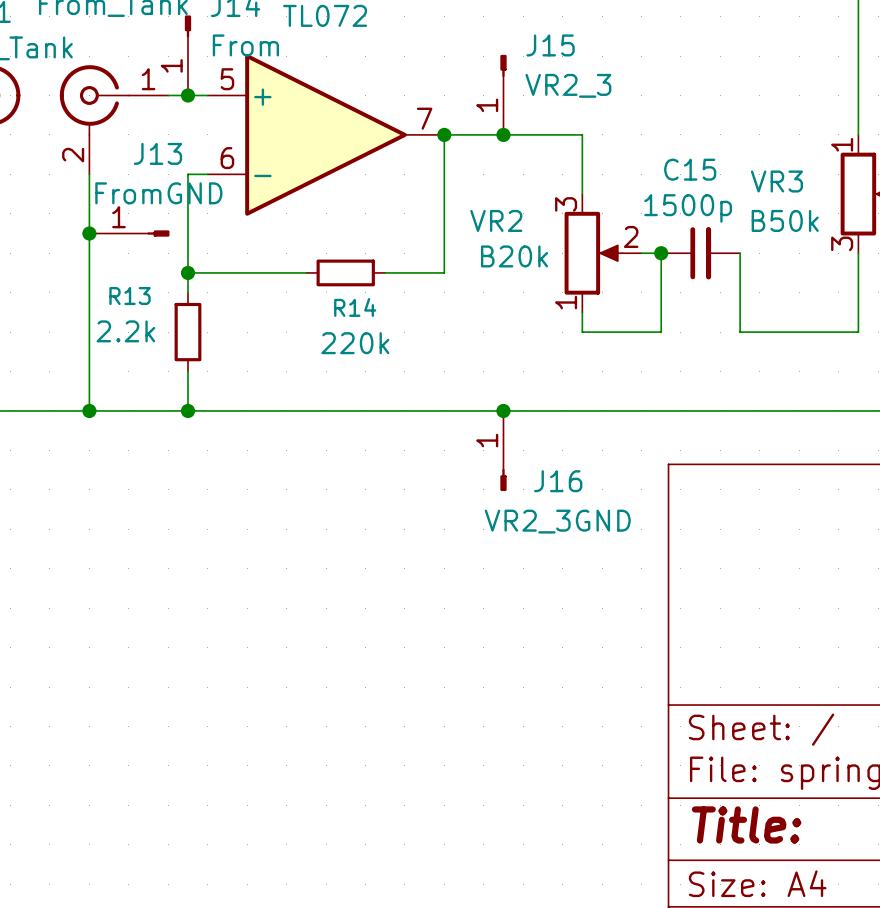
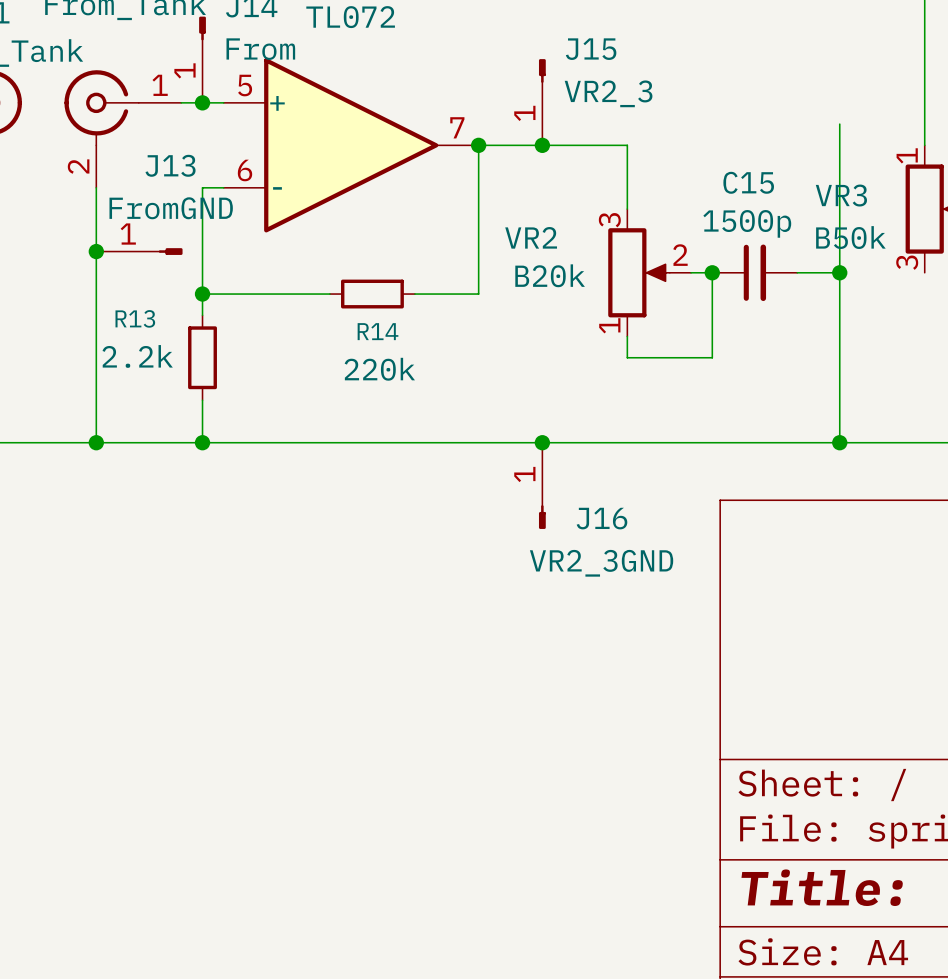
wire: none -> (839, 124) (839, 442)
wire: (740, 253) (740, 332) (858, 332) (858, 253) -> (797, 272) (839, 272)
junction: none -> (839, 272)
junction: none -> (839, 442)

